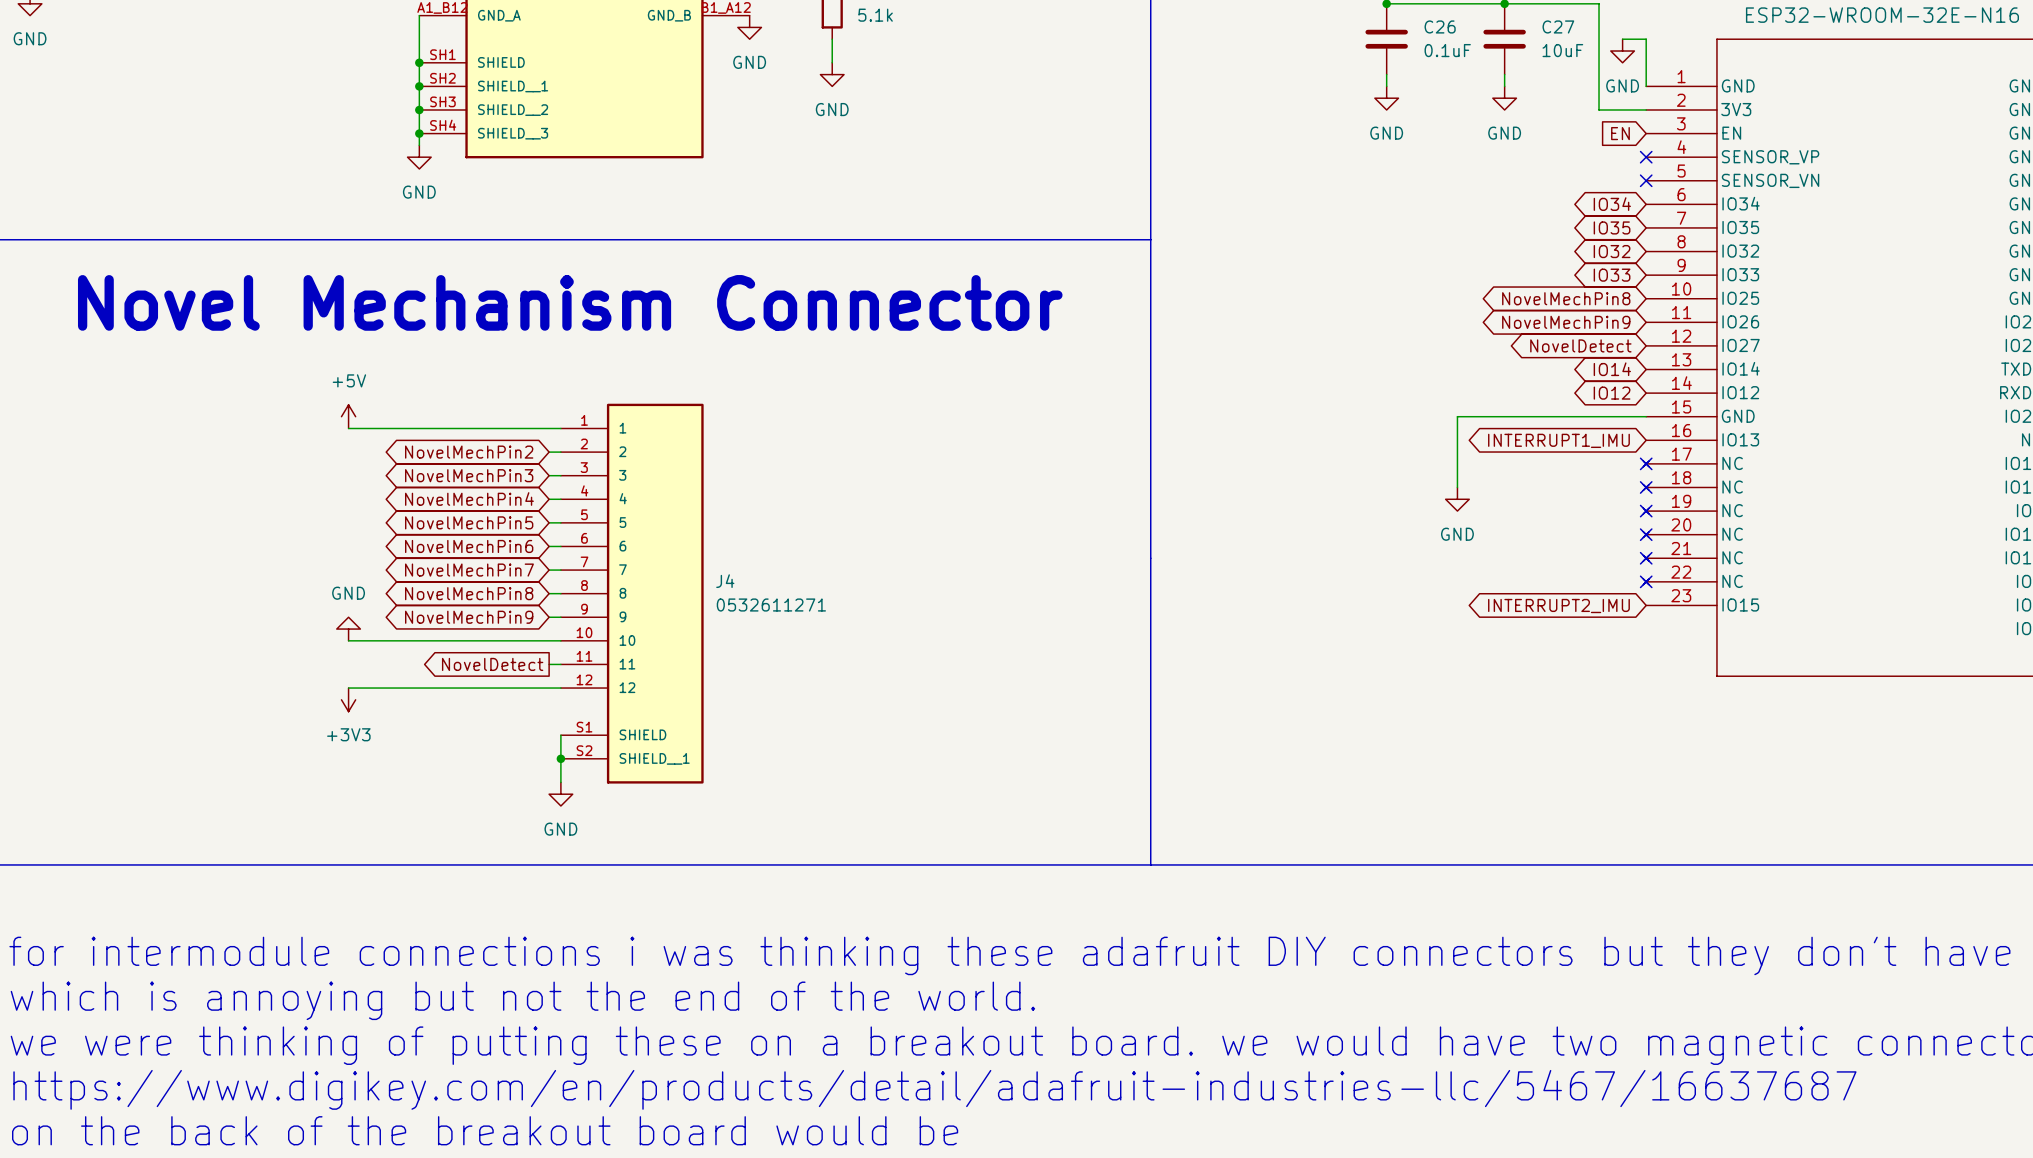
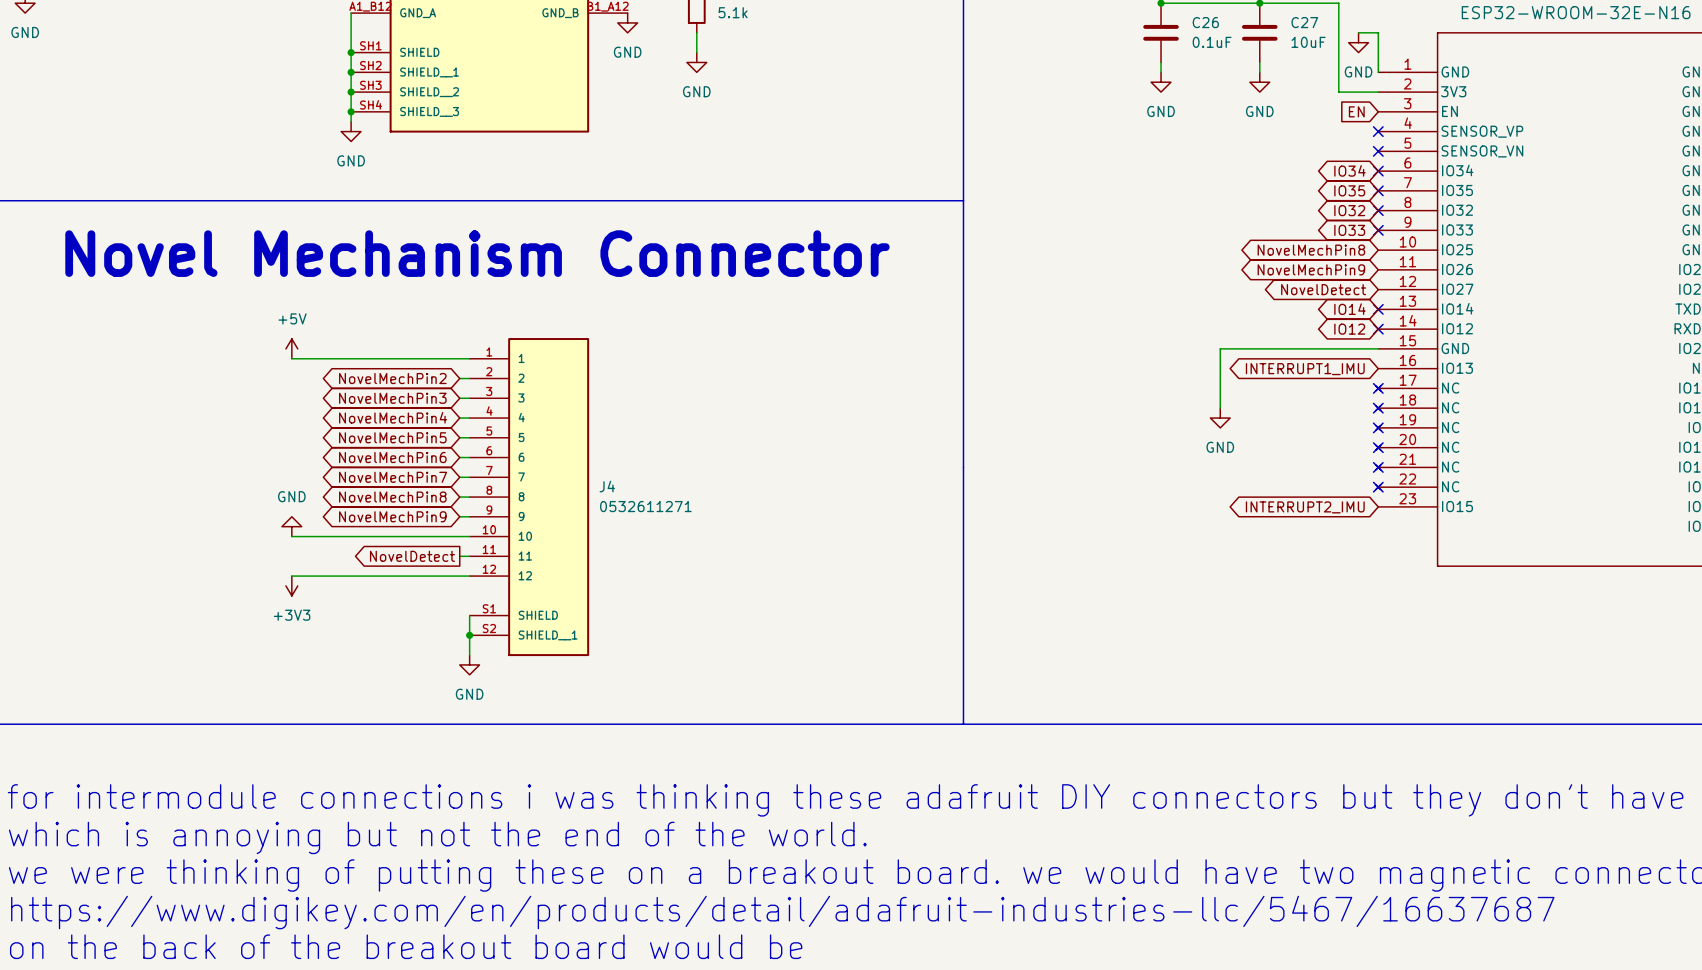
no-connect mark: none -> (1378, 171)
no-connect mark: none -> (1378, 190)
no-connect mark: none -> (1378, 210)
no-connect mark: none -> (1378, 230)
no-connect mark: none -> (1378, 309)
no-connect mark: none -> (1378, 329)

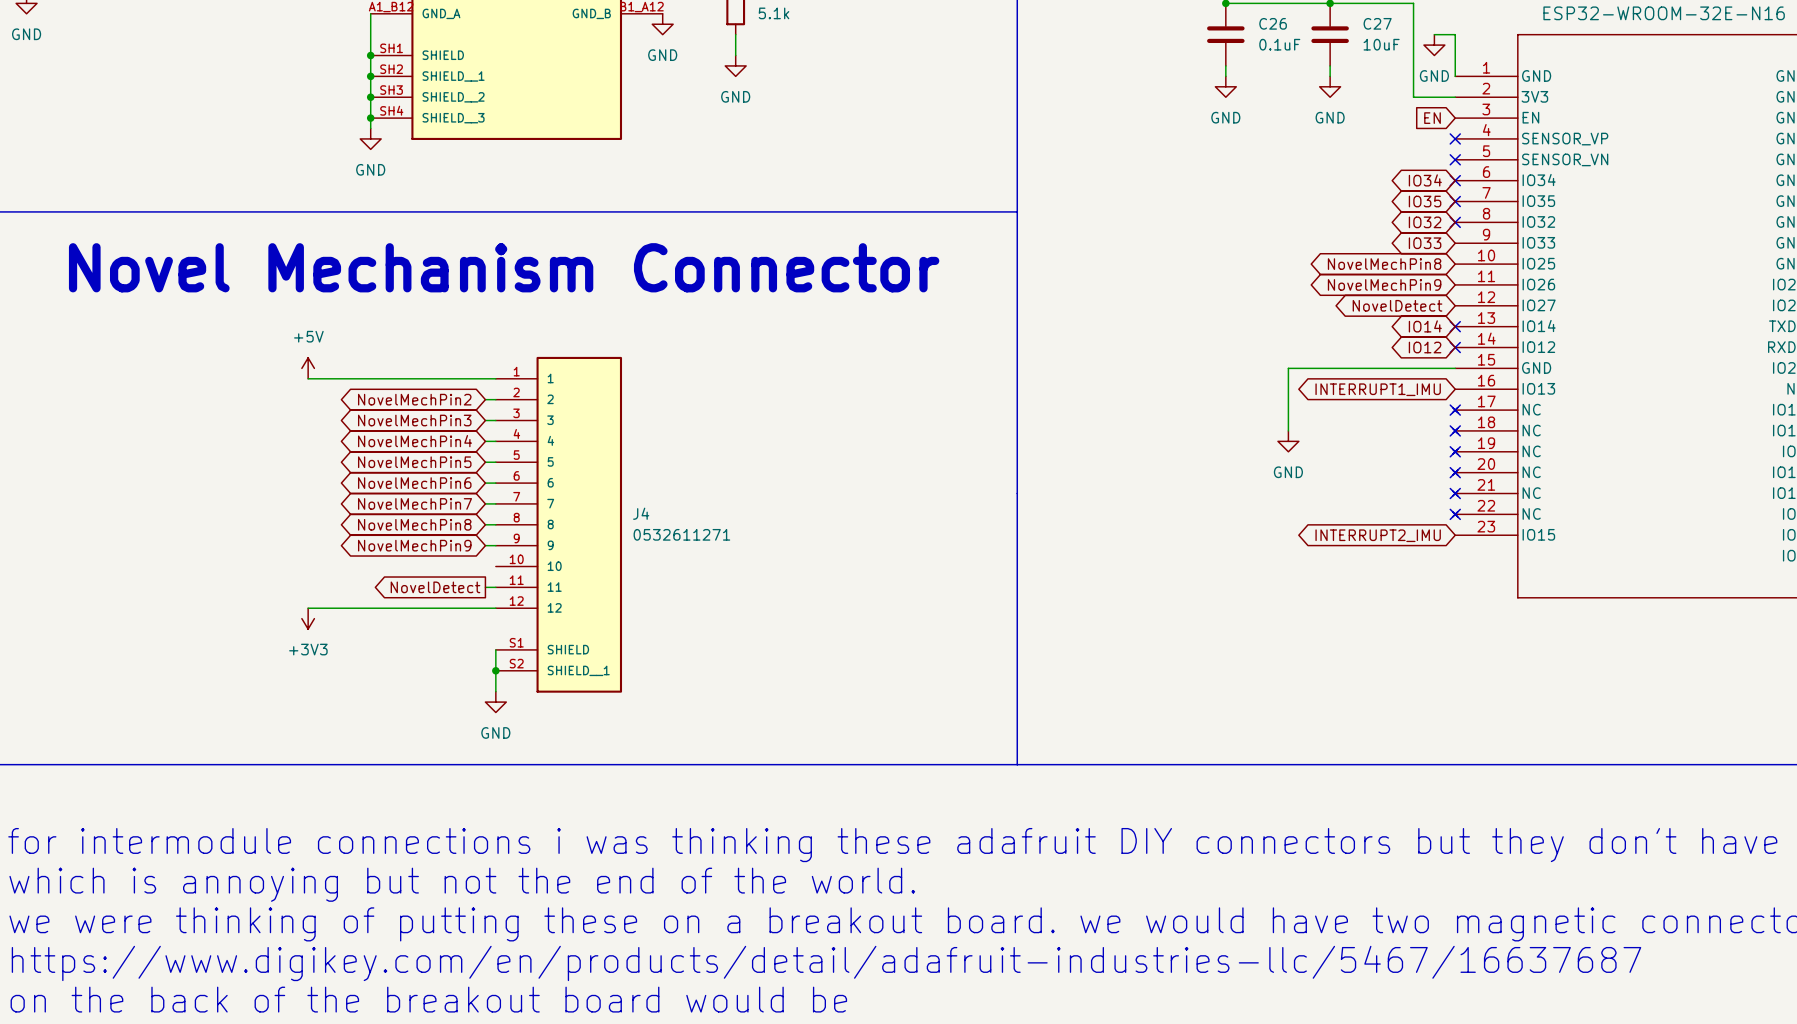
no-connect mark: (1378, 230) -> none
power symbol: GND (291, 526) -> none
wire: (291, 536) (469, 536) -> none

